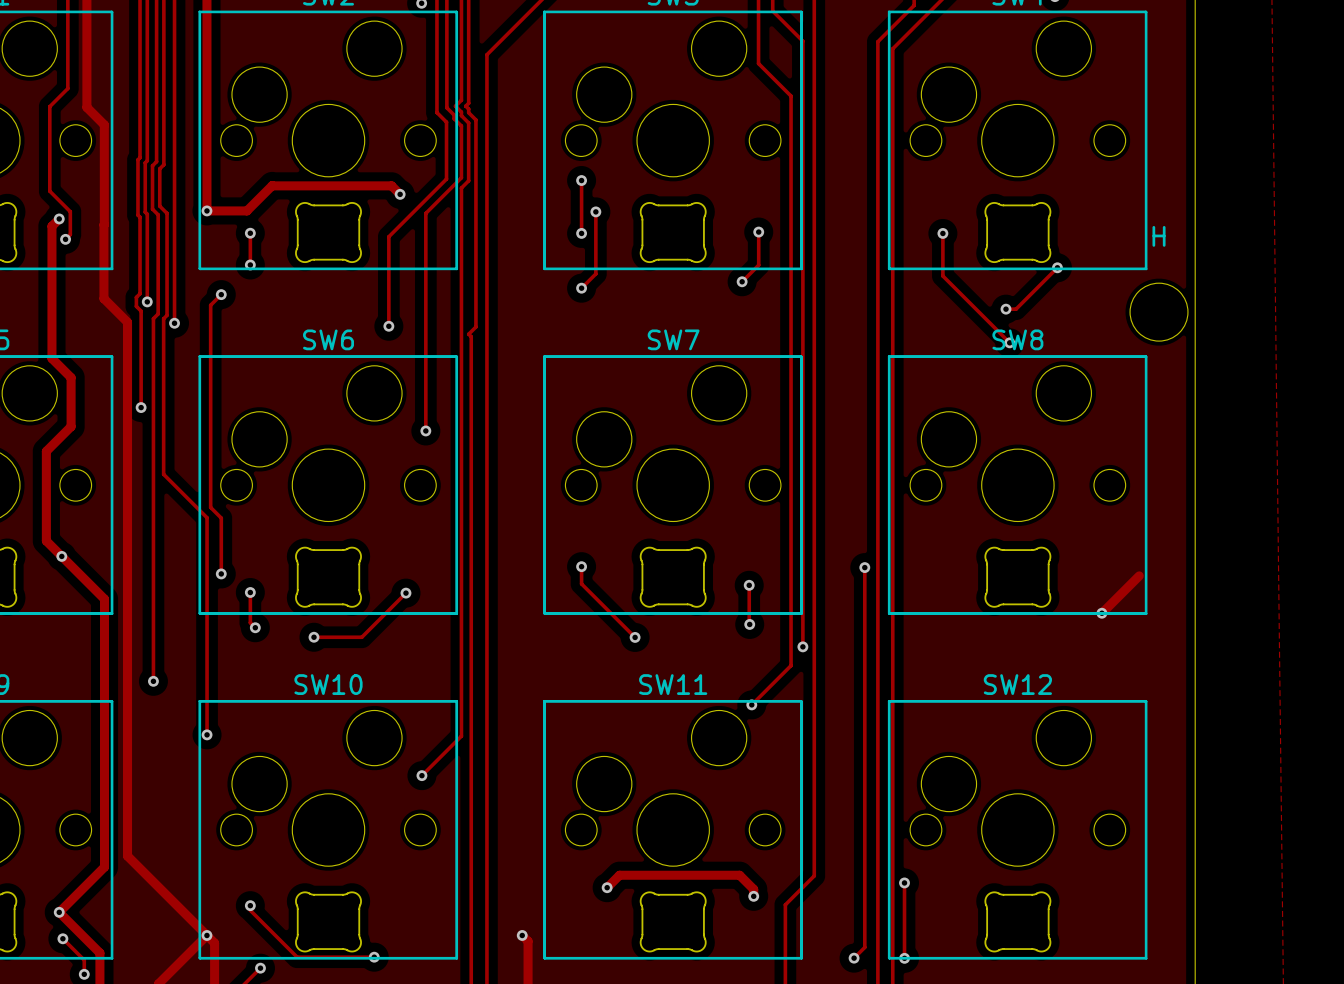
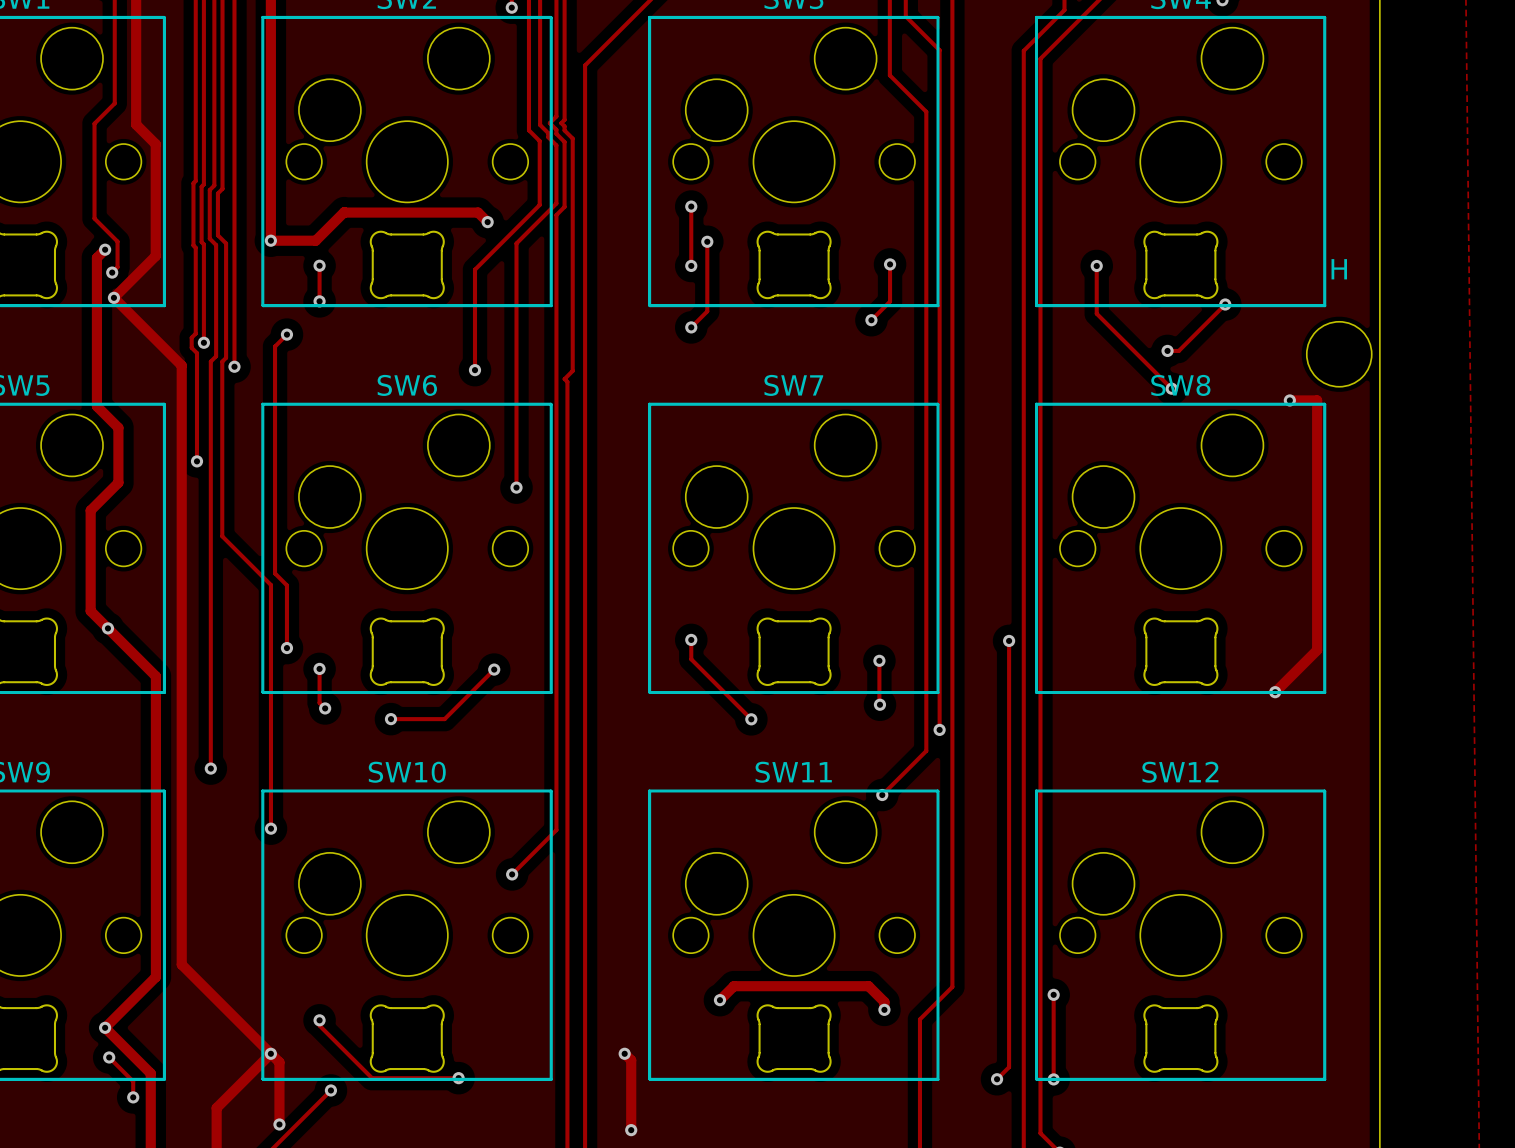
track: (103, 225) (103, 298) -> (155, 256) (113, 297) (155, 339)
via: none -> (113, 297)
track: none -> (1289, 400) (1317, 400) (1317, 650)
via: none -> (1289, 400)

